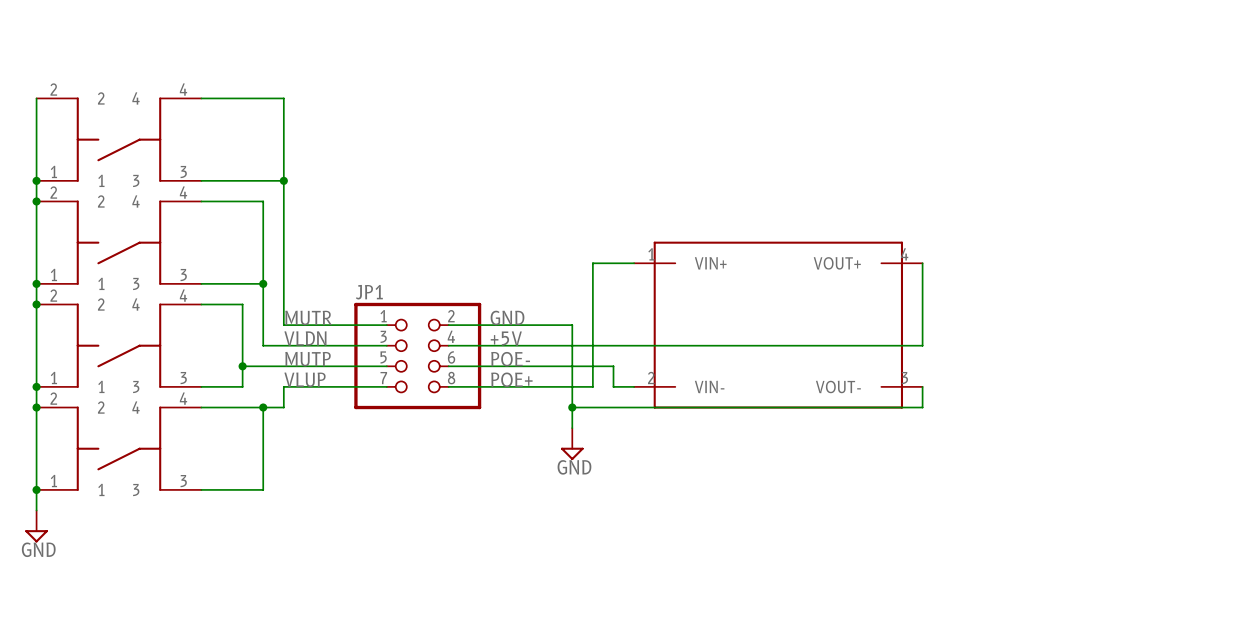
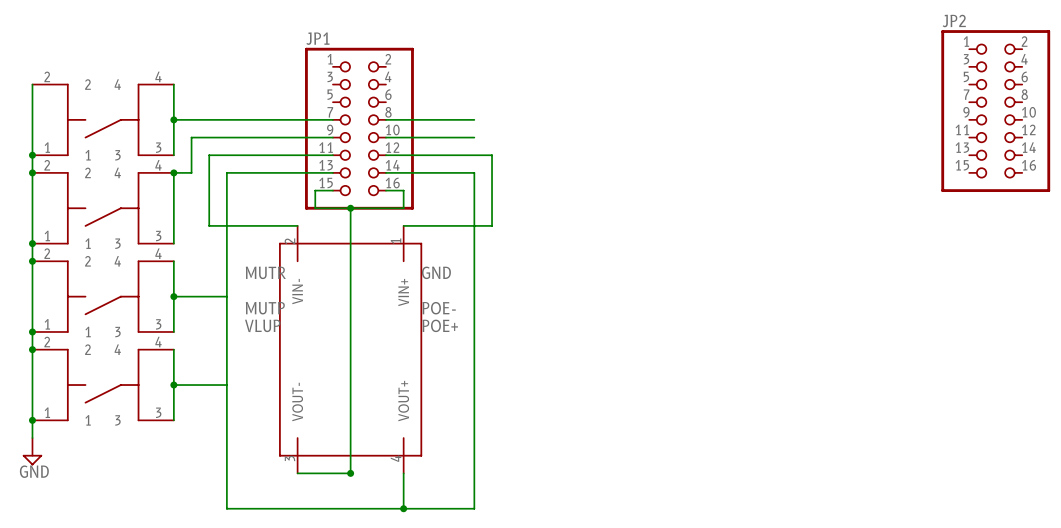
wire: (201, 98) (283, 98) (283, 325) (386, 325) -> none
JP2: none -> (995, 111)
wire: none -> (173, 119) (332, 119)
junction: none -> (173, 119)
wire: none -> (385, 119) (474, 119)
wire: none -> (385, 137) (474, 137)
wire: (201, 180) (242, 180) -> (173, 155) (173, 84)
wire: none -> (209, 155) (209, 225) (297, 225)
wire: none -> (244, 155) (332, 155)
junction: (283, 180) -> none
wire: none -> (385, 155) (492, 155) (492, 225) (403, 225)
junction: none -> (173, 172)
wire: (222, 201) (263, 201) -> (191, 172) (191, 137) (332, 137)
wire: none -> (385, 172) (474, 172) (474, 508) (226, 508) (226, 420)
wire: none -> (332, 190) (315, 190) (315, 208) (403, 208) (403, 190) (385, 190)
wire: none -> (350, 208) (350, 473) (297, 473)
junction: none -> (350, 208)
wire: (634, 263) (592, 263) (592, 386) (448, 386) -> none
wire: (922, 263) (922, 345) (448, 345) -> none
wire: (201, 283) (263, 283) -> (173, 243) (173, 172)
junction: (263, 283) -> none
JP1 name position: JP1 (369, 292) -> JP1 (317, 38)
JP1 symbol: [354, 302, 482, 410] -> [305, 47, 414, 210]
wire: (201, 304) (242, 304) (242, 386) (201, 386) -> (173, 261) (173, 331)
wire: (448, 325) (572, 325) (572, 428) -> none
part: (778, 325) -> none
label: VLDN (305, 338) -> none
label: +5V (506, 338) -> none
wire: none -> (173, 296) (226, 296) (226, 349)
junction: none -> (173, 296)
wire: (263, 345) (386, 345) -> (226, 172) (332, 172)
wire: (242, 366) (386, 366) -> none
junction: (242, 366) -> none
wire: (448, 366) (613, 366) (613, 386) (634, 386) -> none
wire: (386, 386) (283, 386) (283, 407) (201, 407) -> none
wire: (922, 386) (922, 407) (572, 407) -> none
junction: (263, 407) -> none
part: none -> (350, 349)
junction: (572, 407) -> none
power symbol: GND (572, 444) -> none
wire: none -> (173, 385) (226, 385)
junction: none -> (173, 385)
wire: (201, 489) (263, 489) -> (173, 420) (173, 349)
junction: none -> (350, 473)
wire: none -> (403, 473) (403, 508)
junction: none -> (403, 508)

